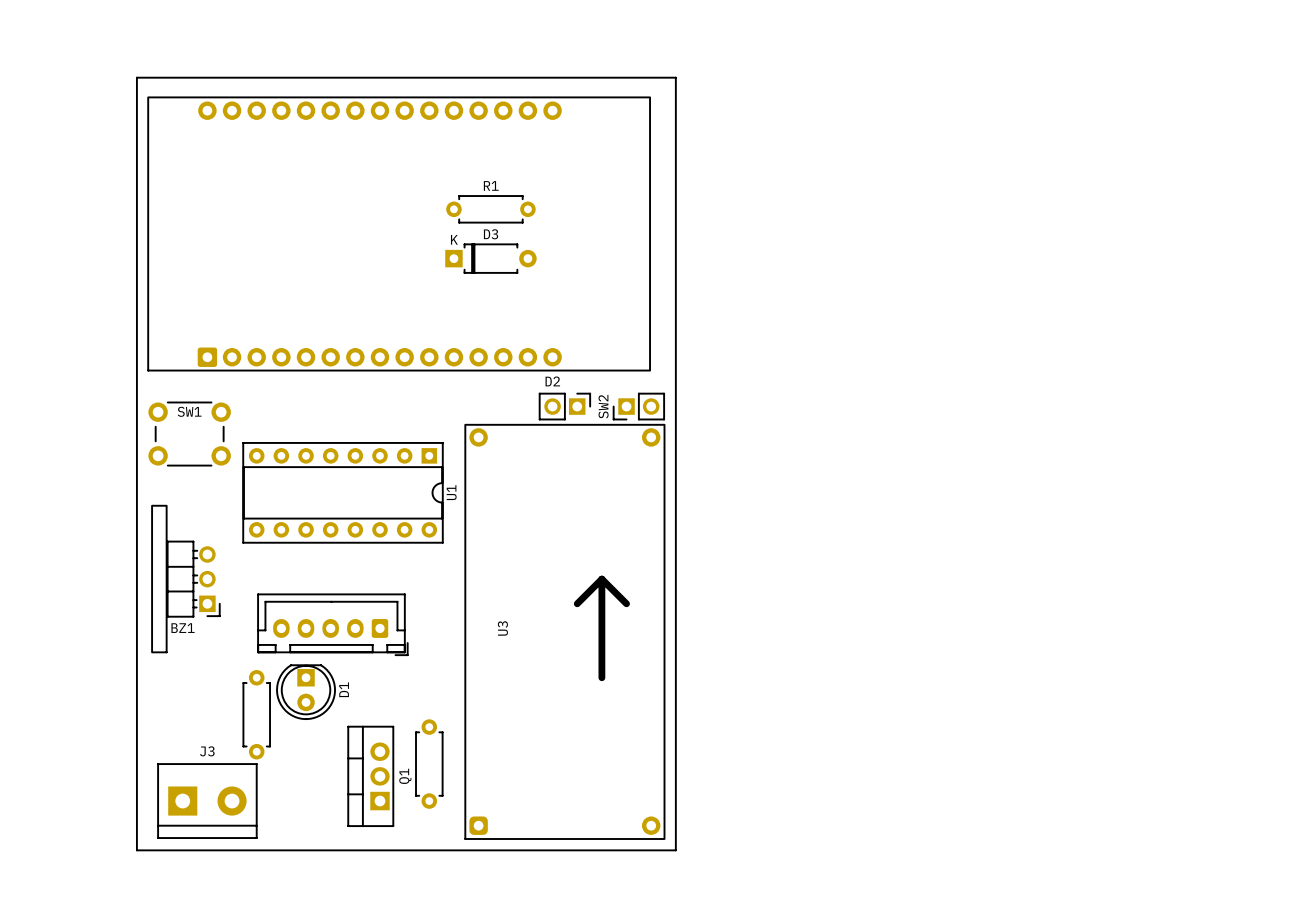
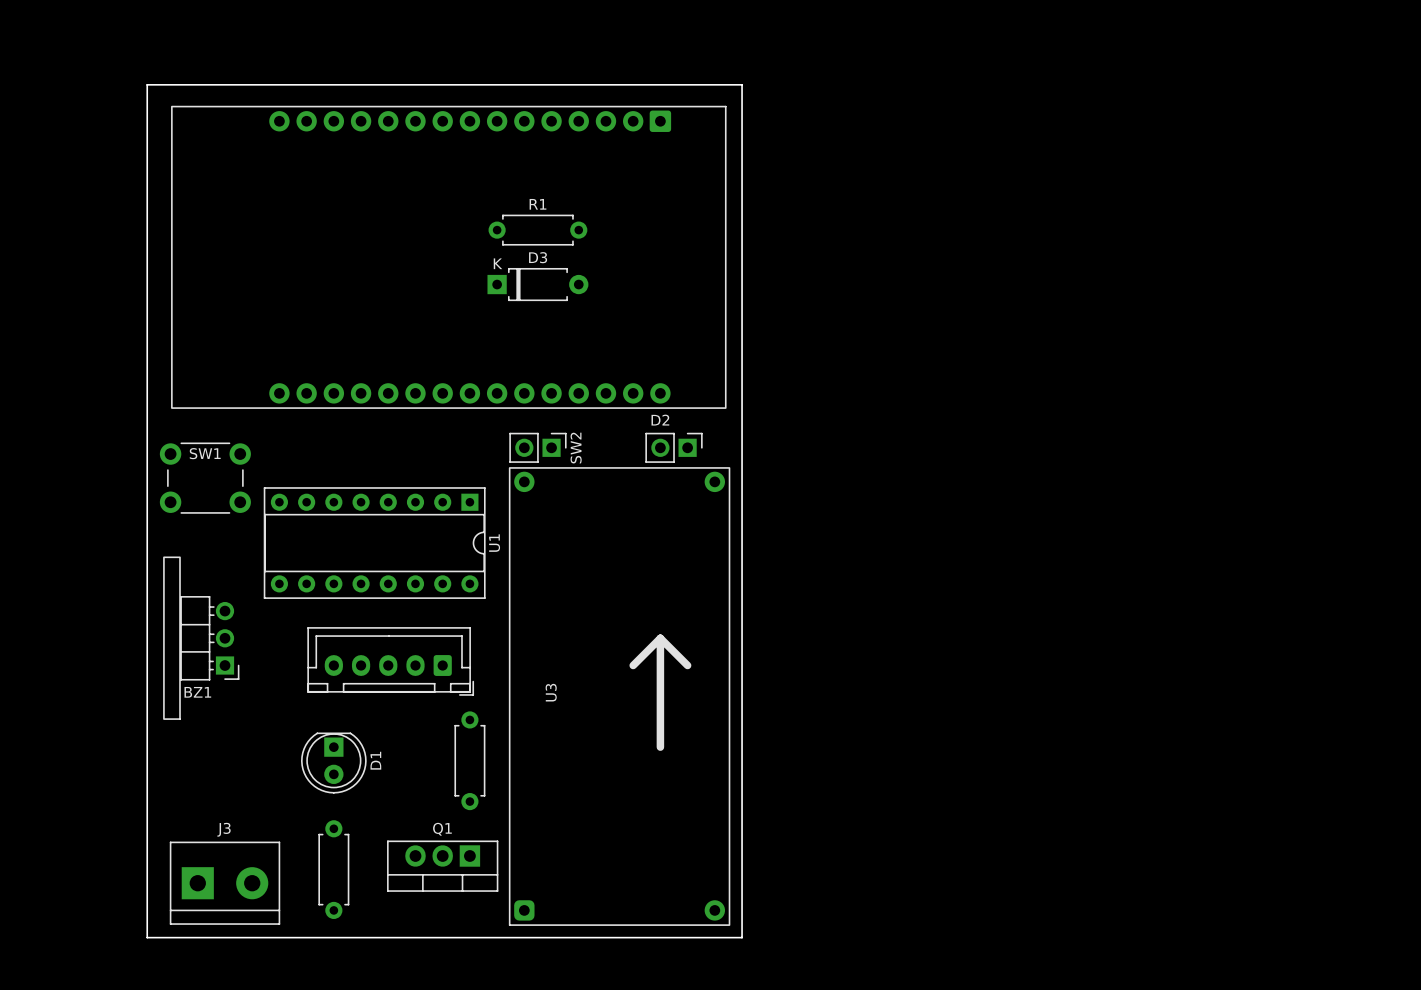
part rotation: 0° (399, 233) -> 180° (448, 257)
D2 position: (564, 406) -> (674, 447)
SW2 rotation: 0° (638, 406) -> 180° (537, 447)
SW2 position: (638, 406) -> (537, 447)
part position: (332, 624) -> (390, 661)
part: none -> (469, 760)
part: (256, 714) -> none
part: (429, 764) -> none
Q1 rotation: 0° (370, 776) -> 90° counterclockwise (442, 866)
part: none -> (333, 869)

